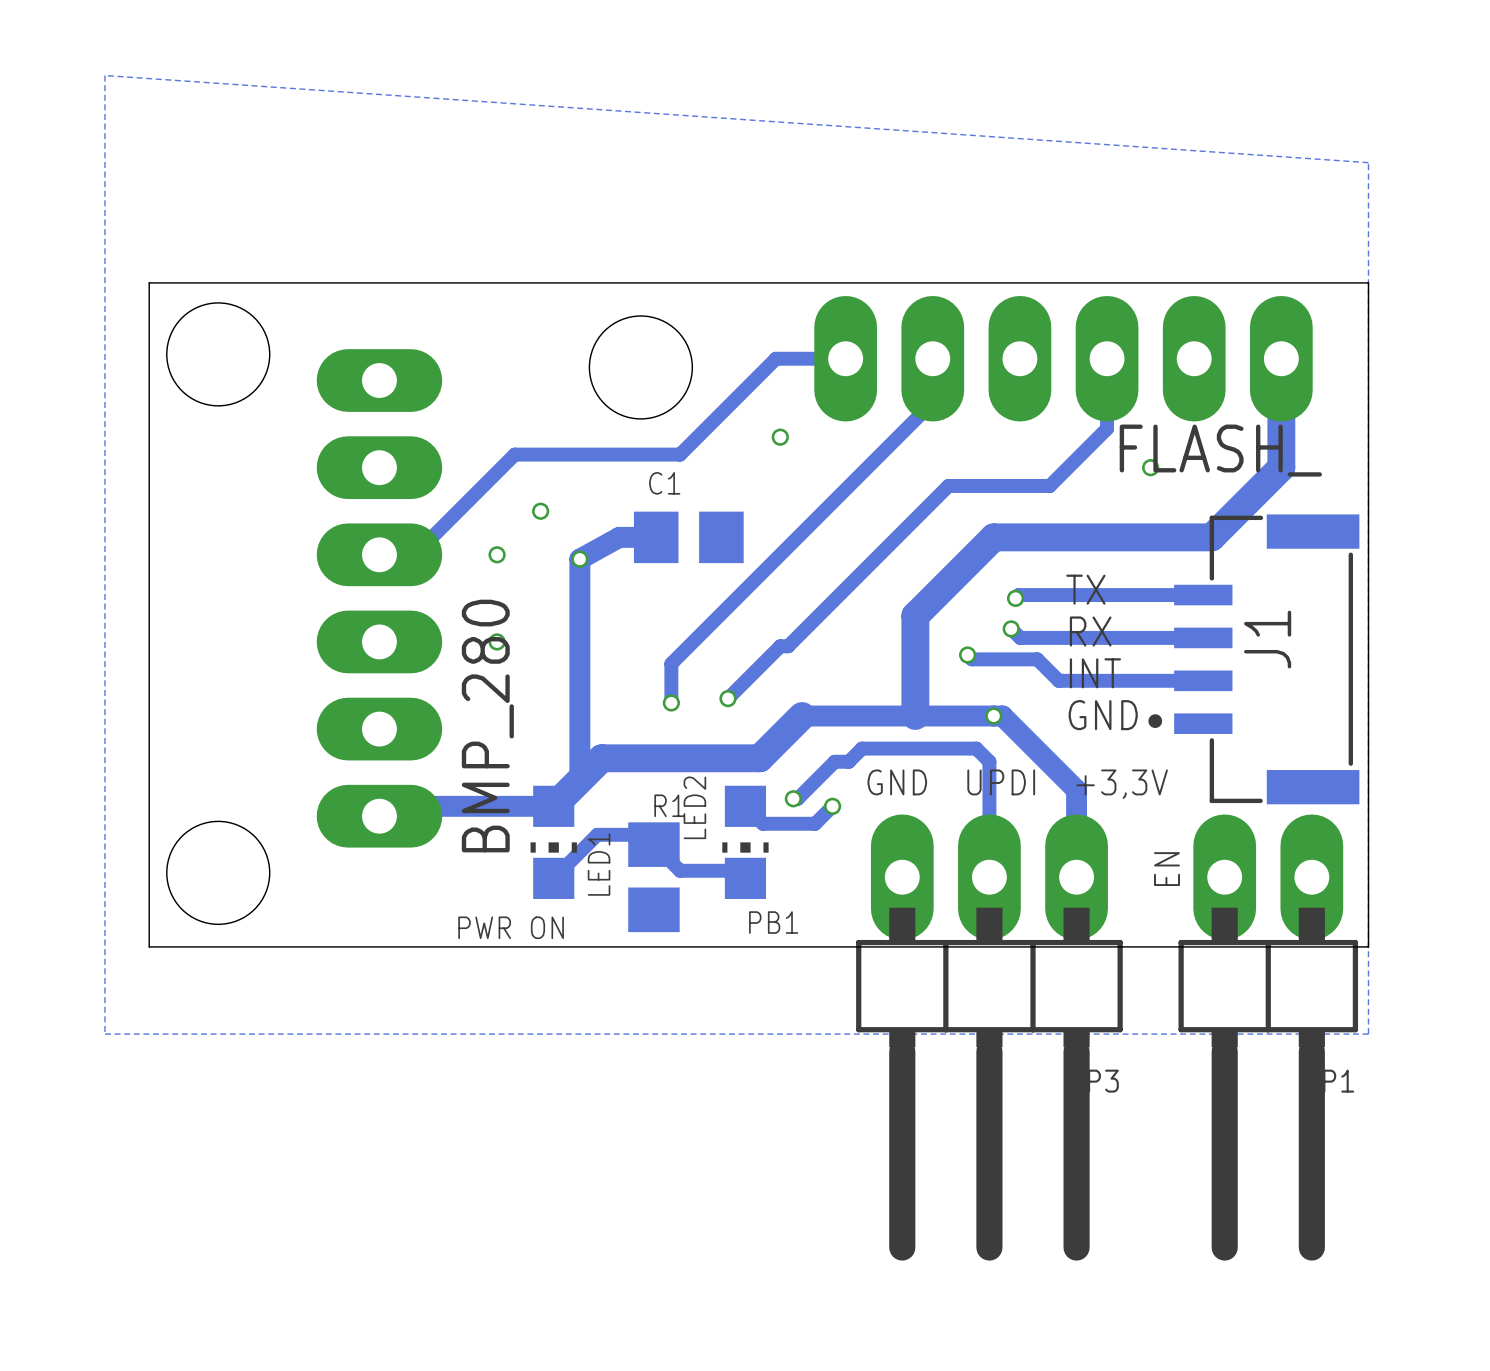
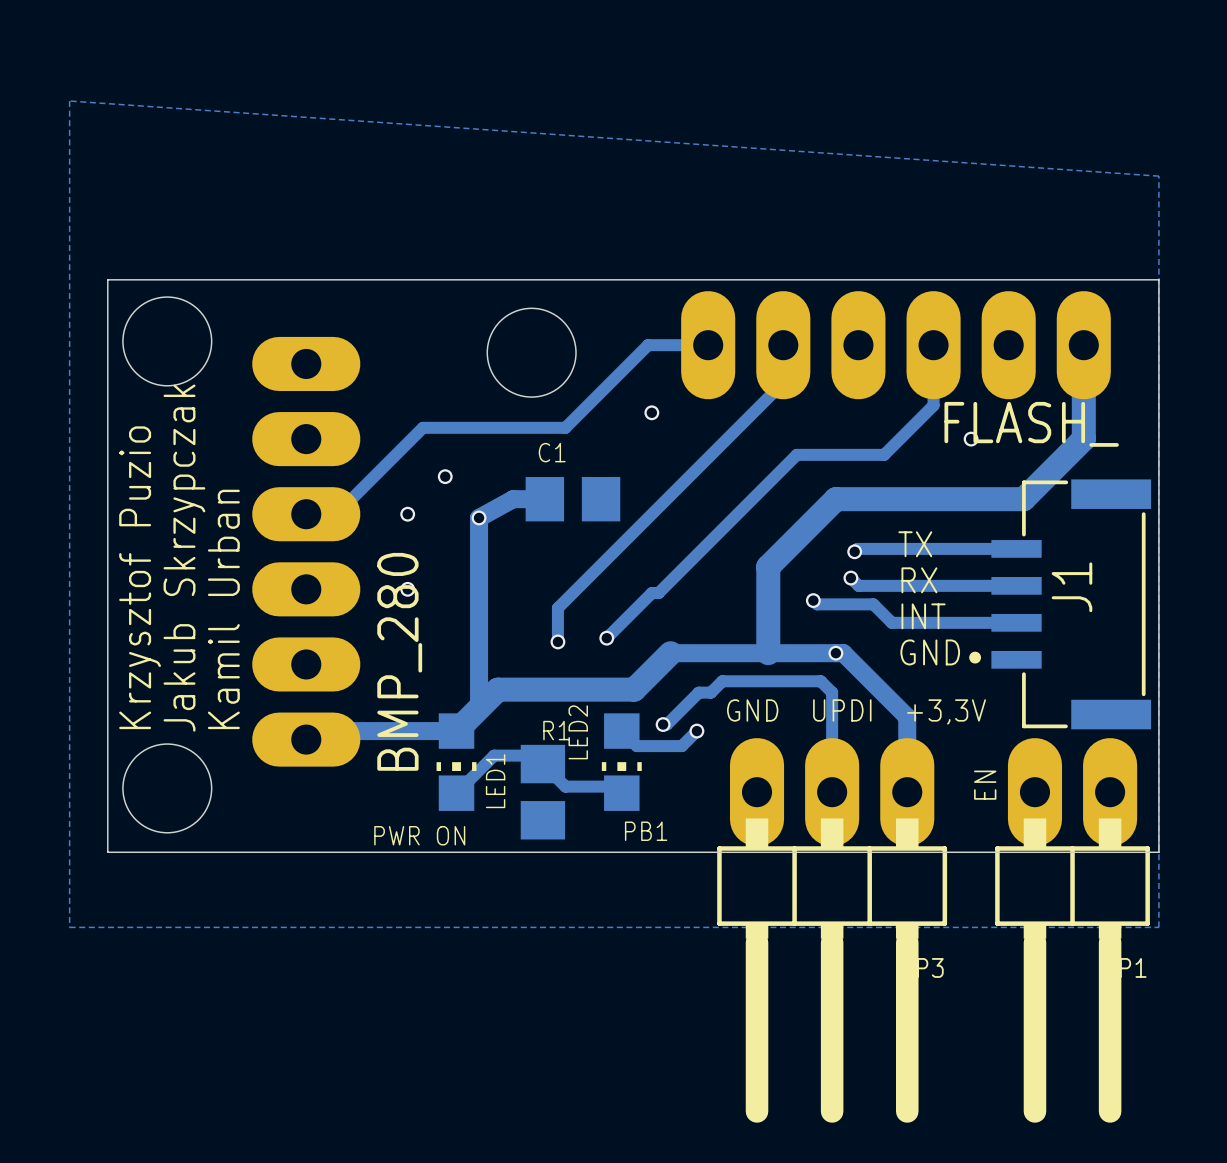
text: none -> Jakub Skrzypczak (184, 558)
text: none -> Krzysztof Puzio (140, 577)
text: none -> Kamil Urban (223, 609)

